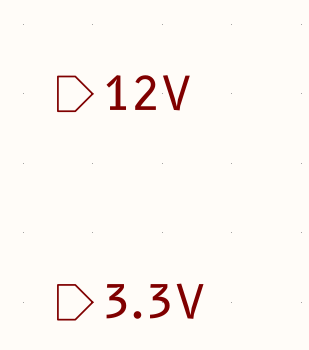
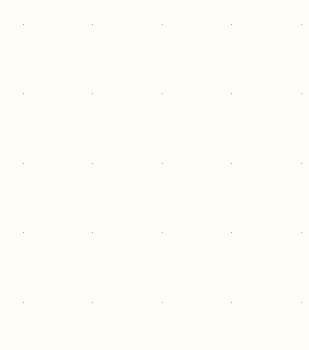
hierarchical label: 12V (148, 92) -> none
hierarchical label: 3.3V (155, 301) -> none

